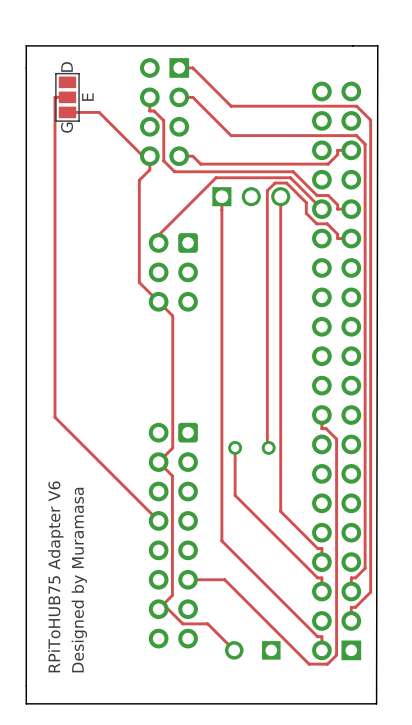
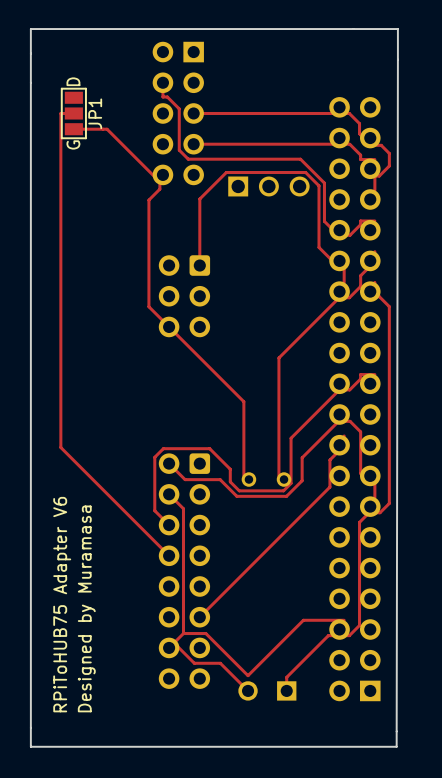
board edge: (26, 45) (377, 45) -> (30, 59) (30, 29) (397, 29) (397, 59)
track: none -> (162, 82) (162, 97) (167, 97) (179, 108) (179, 150) (188, 159) (300, 159) (324, 183) (324, 221) (338, 235) (350, 235) (360, 224) (360, 220) (374, 220)
track: (179, 67) (192, 67) (231, 106) (356, 106) (370, 120) (370, 592) (355, 607) (351, 607) (351, 620) -> none
E name: E (87, 97) -> JP1 (95, 113)
track: (149, 97) (149, 111) (154, 111) (163, 120) (163, 160) (174, 171) (293, 171) (317, 195) (328, 195) (337, 204) (337, 209) (351, 209) -> none
part: none -> (178, 113)
track: (192, 97) (231, 135) (356, 135) (365, 144) (365, 568) (355, 577) (351, 577) (351, 591) -> (204, 113) (349, 113) (359, 123) (359, 133) (371, 145) (381, 145) (389, 153) (389, 166) (379, 176) (374, 176) (374, 190)
part: (164, 112) -> none
track: none -> (193, 144) (349, 144) (360, 155) (360, 159) (374, 159)
track: (351, 150) (337, 150) (337, 154) (328, 164) (200, 164) (192, 156) (179, 156) -> none
track: (221, 196) (221, 540) (317, 636) (321, 636) (321, 650) -> none
part position: (251, 196) -> (268, 186)
track: (280, 196) (280, 511) (317, 548) (321, 548) (321, 562) -> none
track: (321, 209) (290, 177) (216, 177) (158, 235) (158, 242) -> none
track: none -> (374, 251) (374, 265) (370, 265) (360, 275) (360, 286) (349, 297) (339, 297) (278, 358) (278, 479)
track: (351, 238) (337, 238) (337, 234) (327, 223) (316, 223) (306, 213) (306, 202) (286, 183) (275, 183) (267, 190) (268, 447) -> none
track: none -> (199, 265) (199, 199) (226, 172) (305, 172) (319, 185) (319, 247) (339, 268) (344, 268) (344, 282)
track: none -> (374, 282) (374, 296) (379, 296) (389, 306) (389, 503) (380, 512) (369, 512) (359, 522) (359, 625) (349, 635) (328, 635) (286, 677) (286, 690)
track: (172, 315) (172, 448) (158, 462) -> (183, 341) (243, 401) (243, 479)
track: none -> (374, 374) (360, 374) (360, 378) (349, 389) (339, 389) (291, 438) (291, 483) (283, 490) (239, 490) (230, 481) (230, 469) (209, 448) (163, 448) (154, 457) (154, 510) (169, 525)
track: (321, 415) (321, 428) (326, 428) (336, 439) (336, 655) (327, 664) (309, 664) (224, 579) (188, 579) -> (344, 435) (344, 450) (339, 450) (329, 460) (329, 487) (199, 617)
track: none -> (169, 463) (185, 479) (220, 479) (236, 496) (286, 496) (302, 480) (302, 457) (338, 421) (350, 421) (360, 431) (360, 473) (370, 483) (374, 483) (374, 497)
track: (235, 447) (235, 495) (317, 577) (321, 577) (321, 591) -> none
track: none -> (344, 620) (303, 620) (248, 675) (205, 633) (183, 633)

